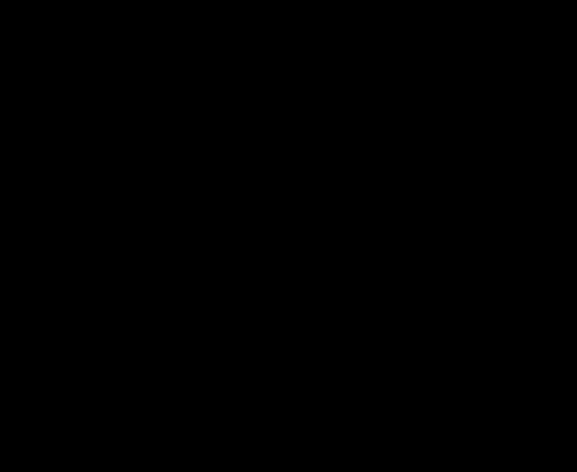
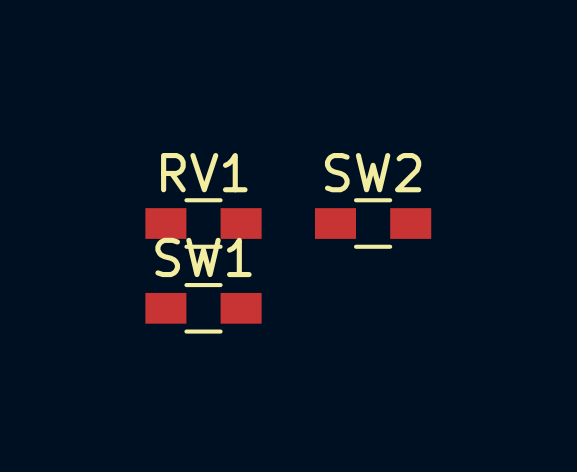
RV1: none -> (203, 223)
SW2: none -> (373, 223)
SW1: none -> (203, 308)

